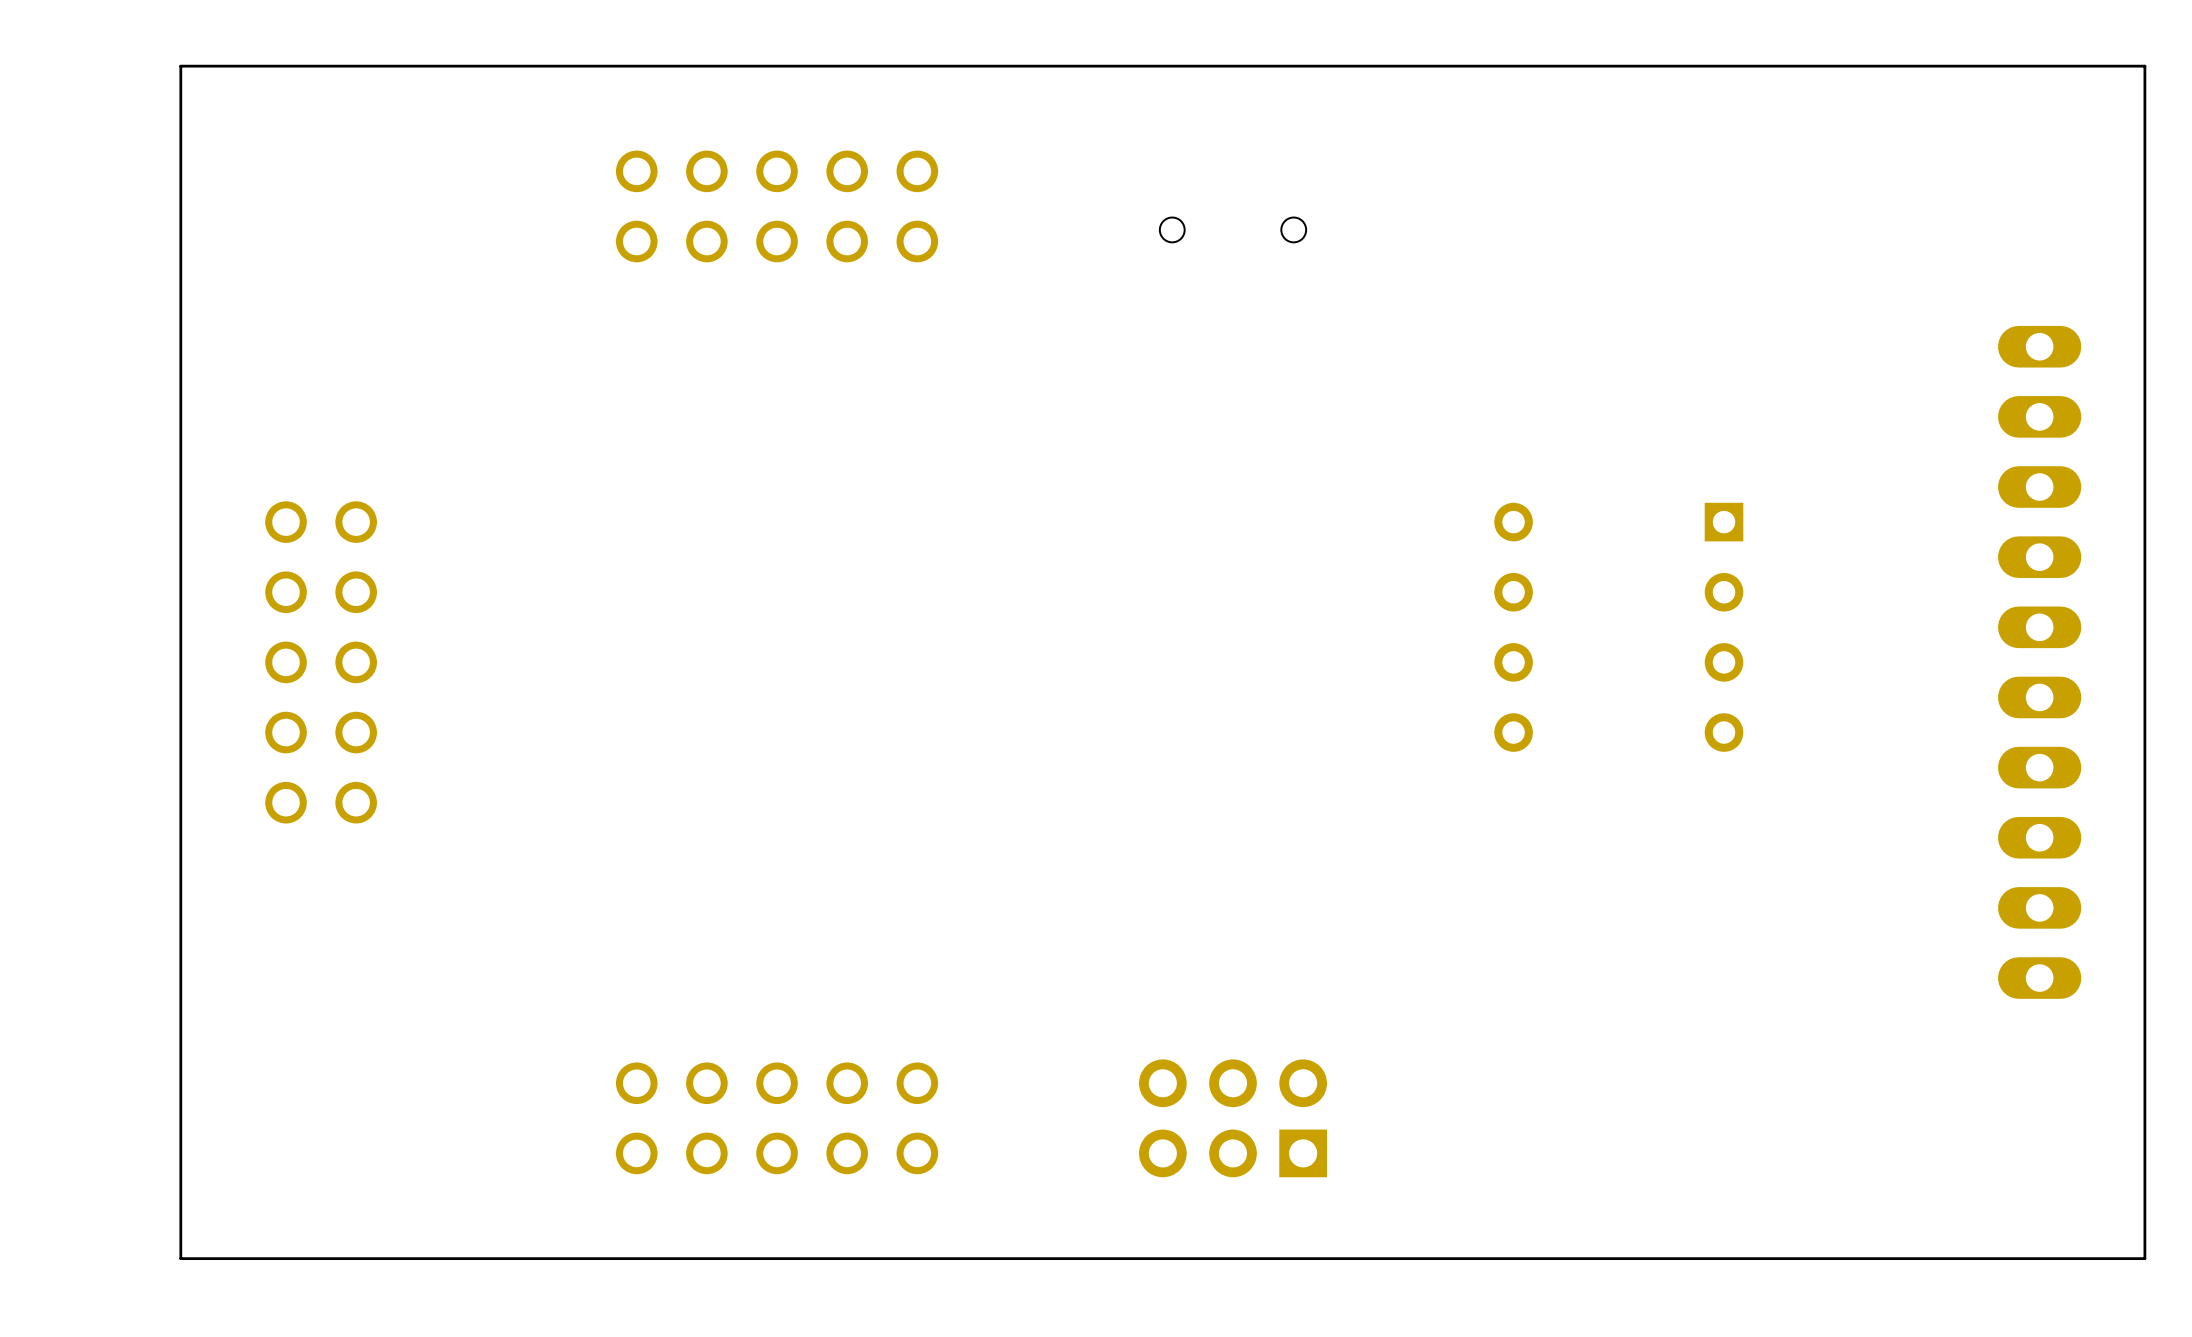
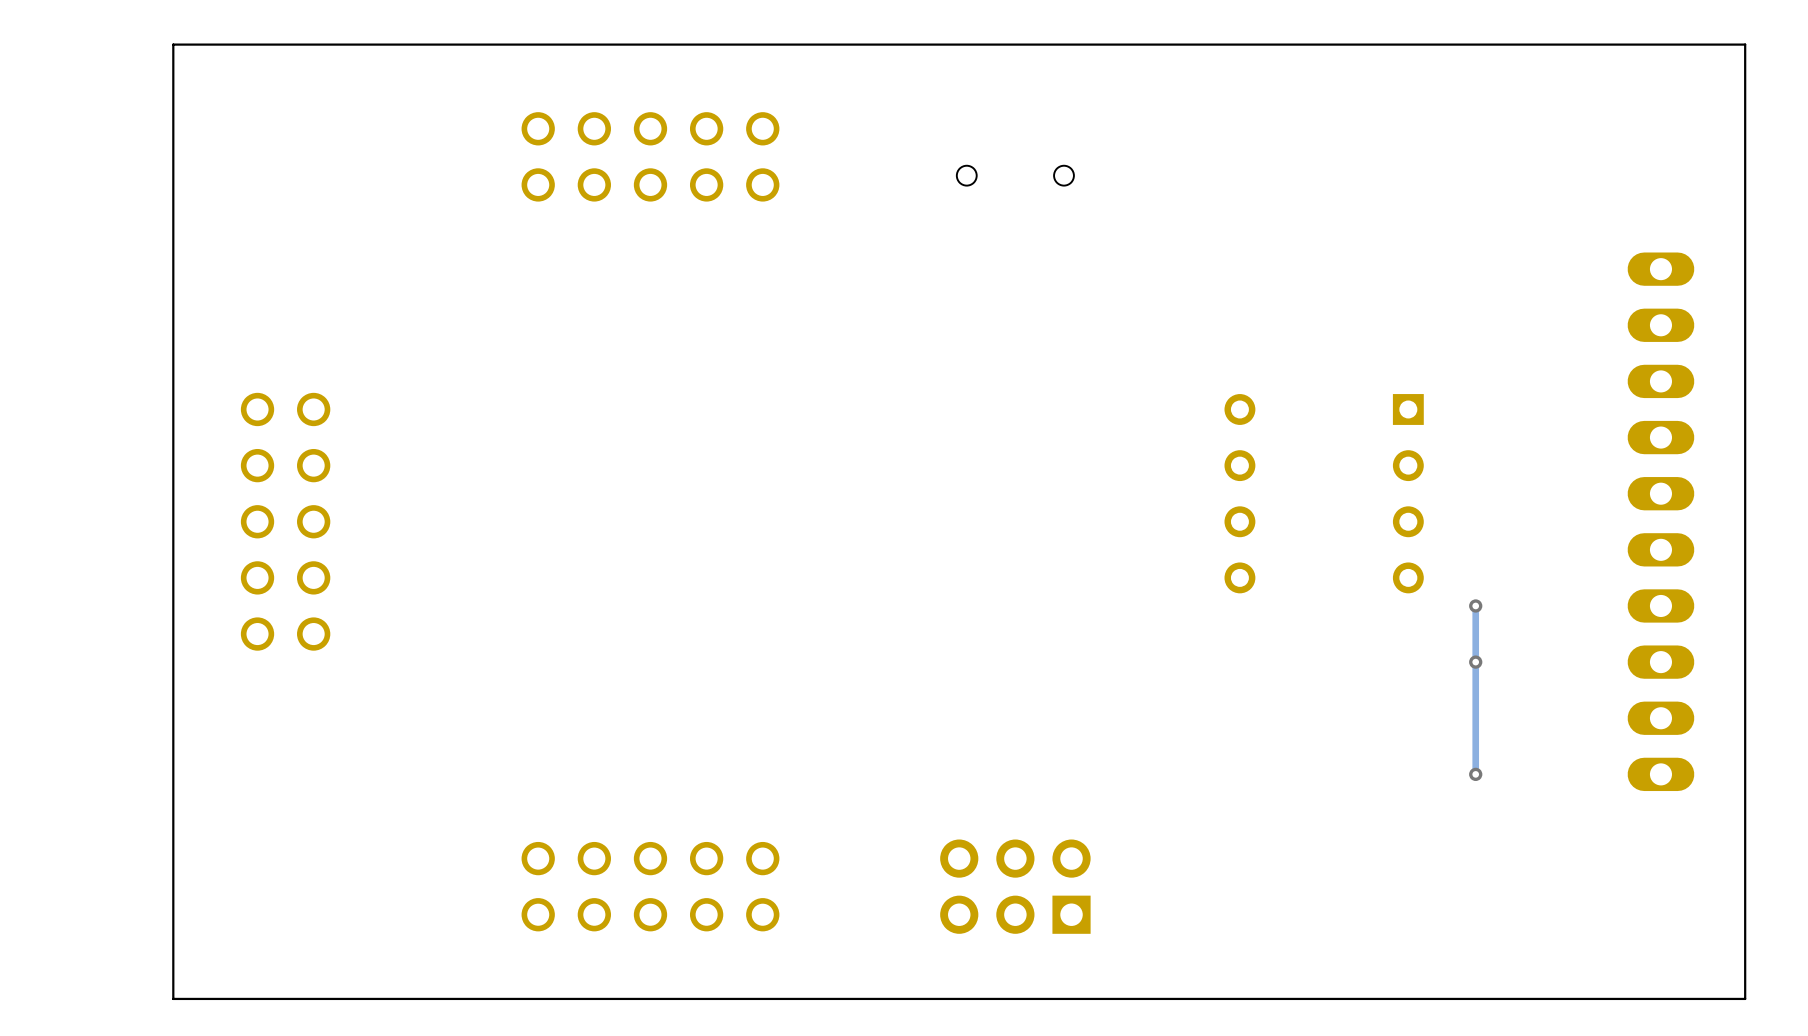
track: none -> (1475, 605) (1475, 774)
via: none -> (1475, 605)
via: none -> (1475, 662)
via: none -> (1475, 774)

